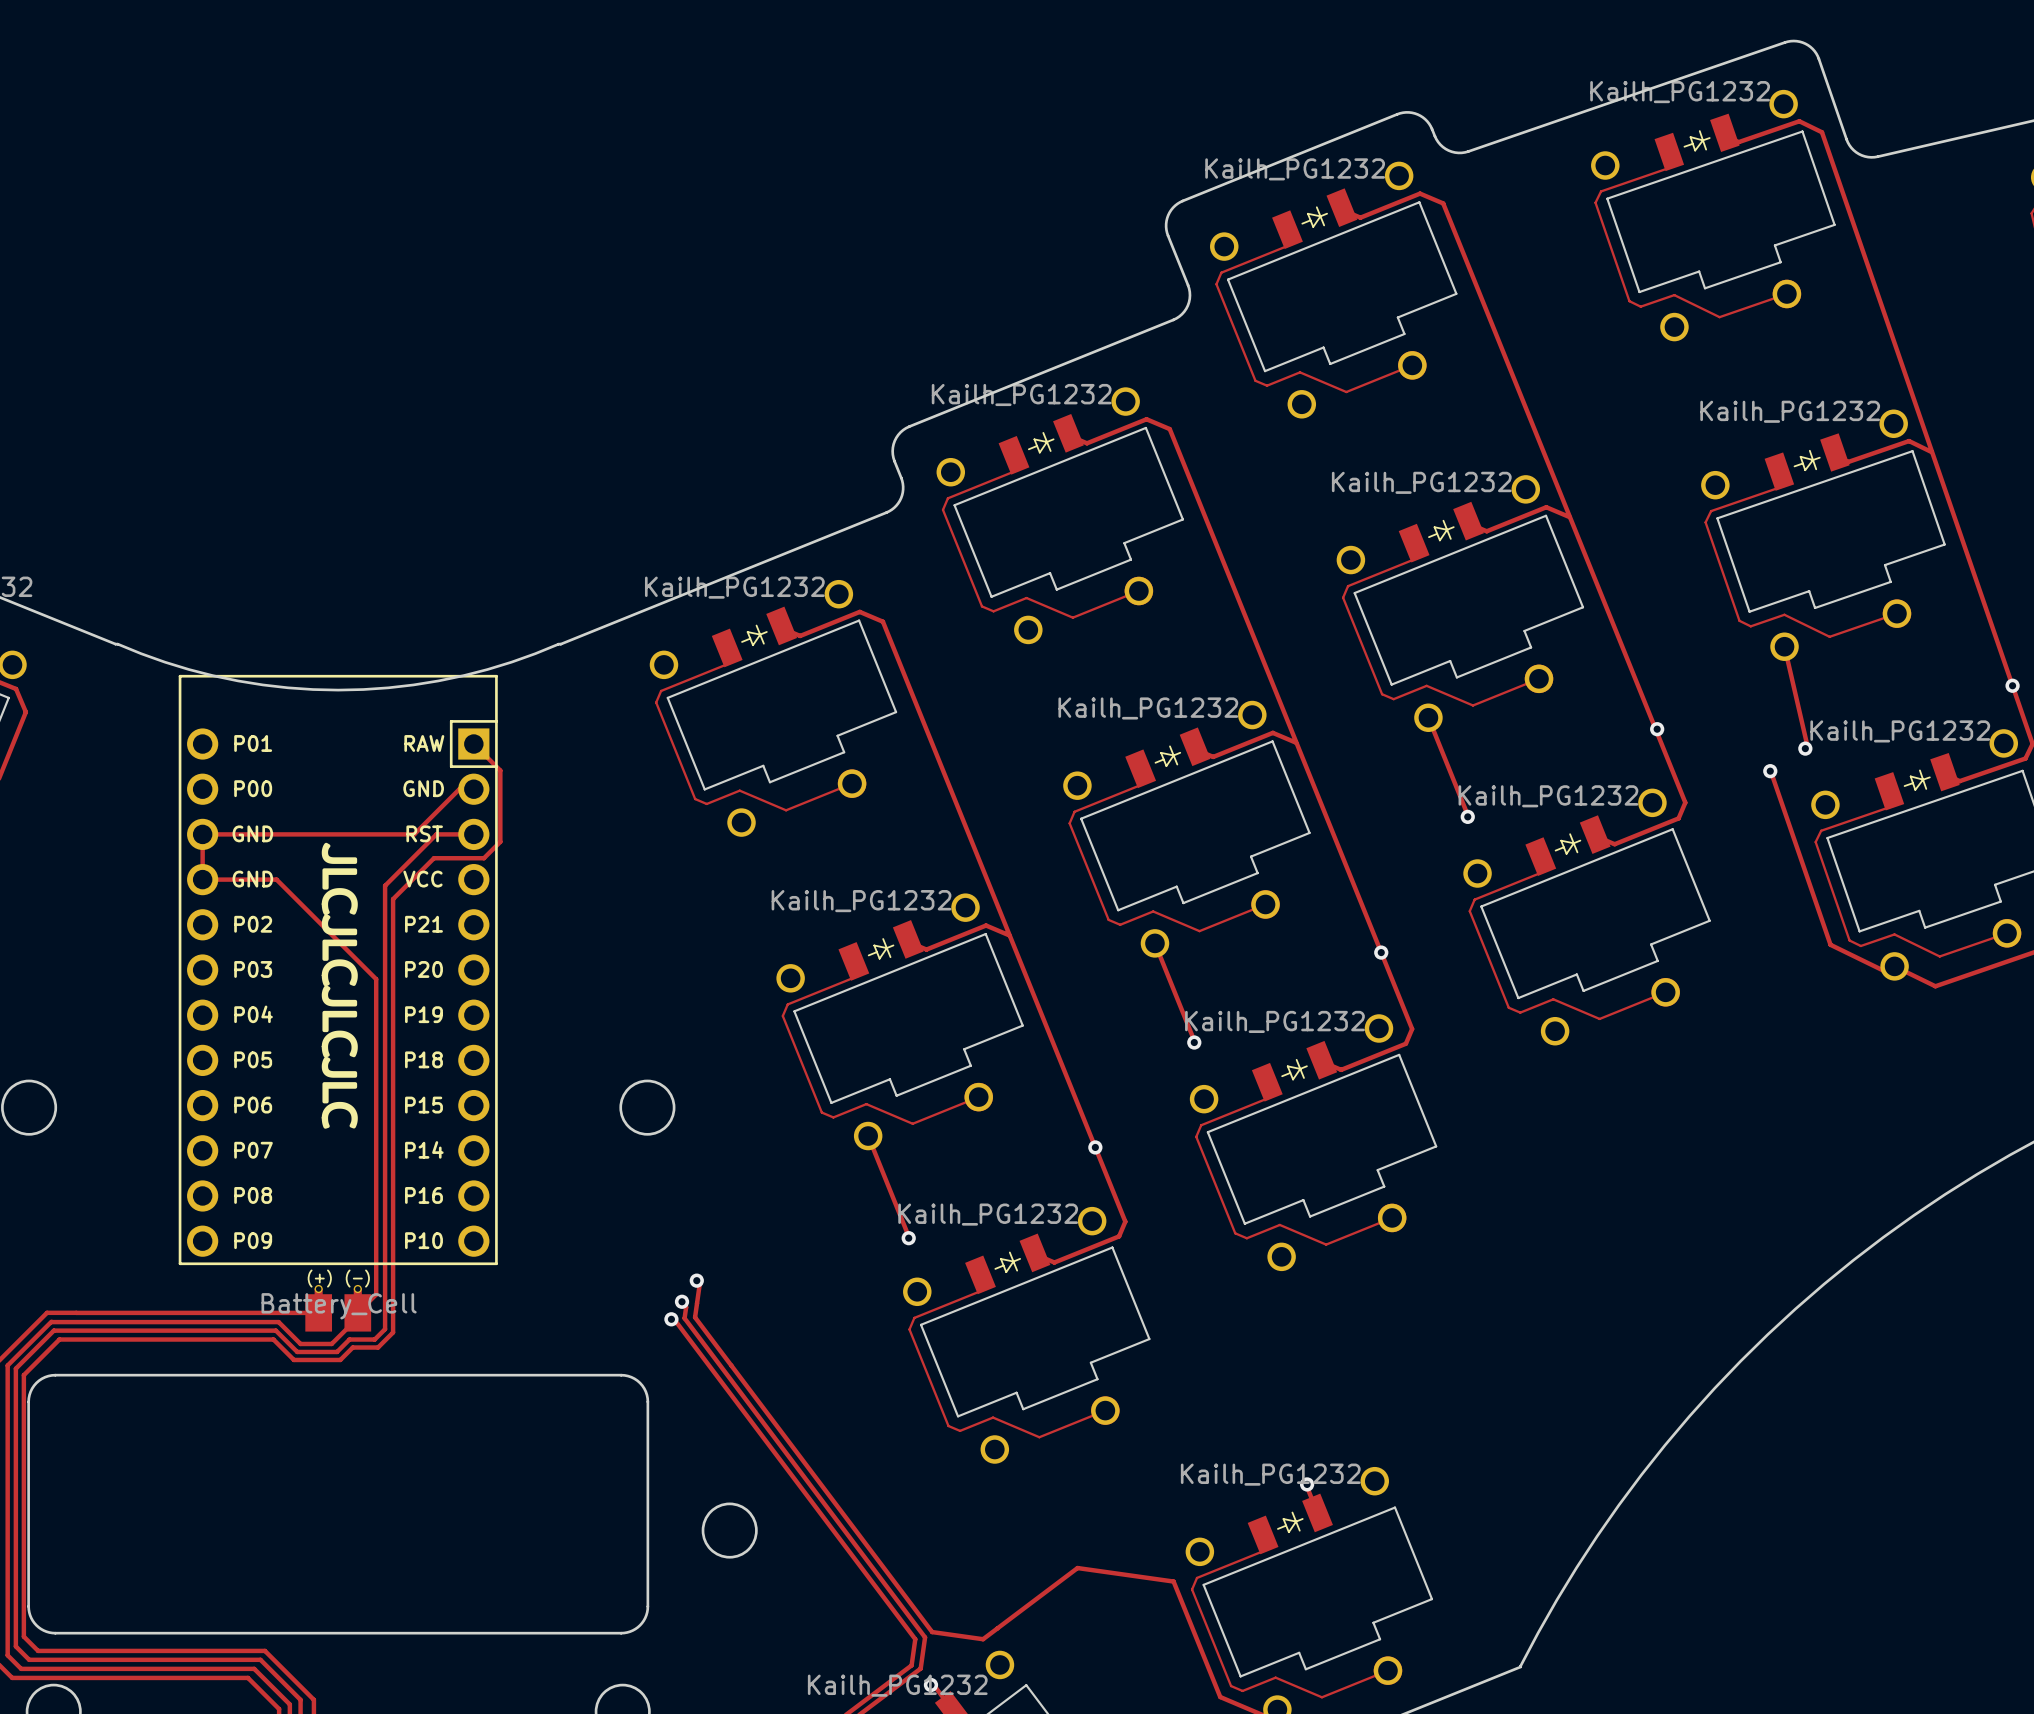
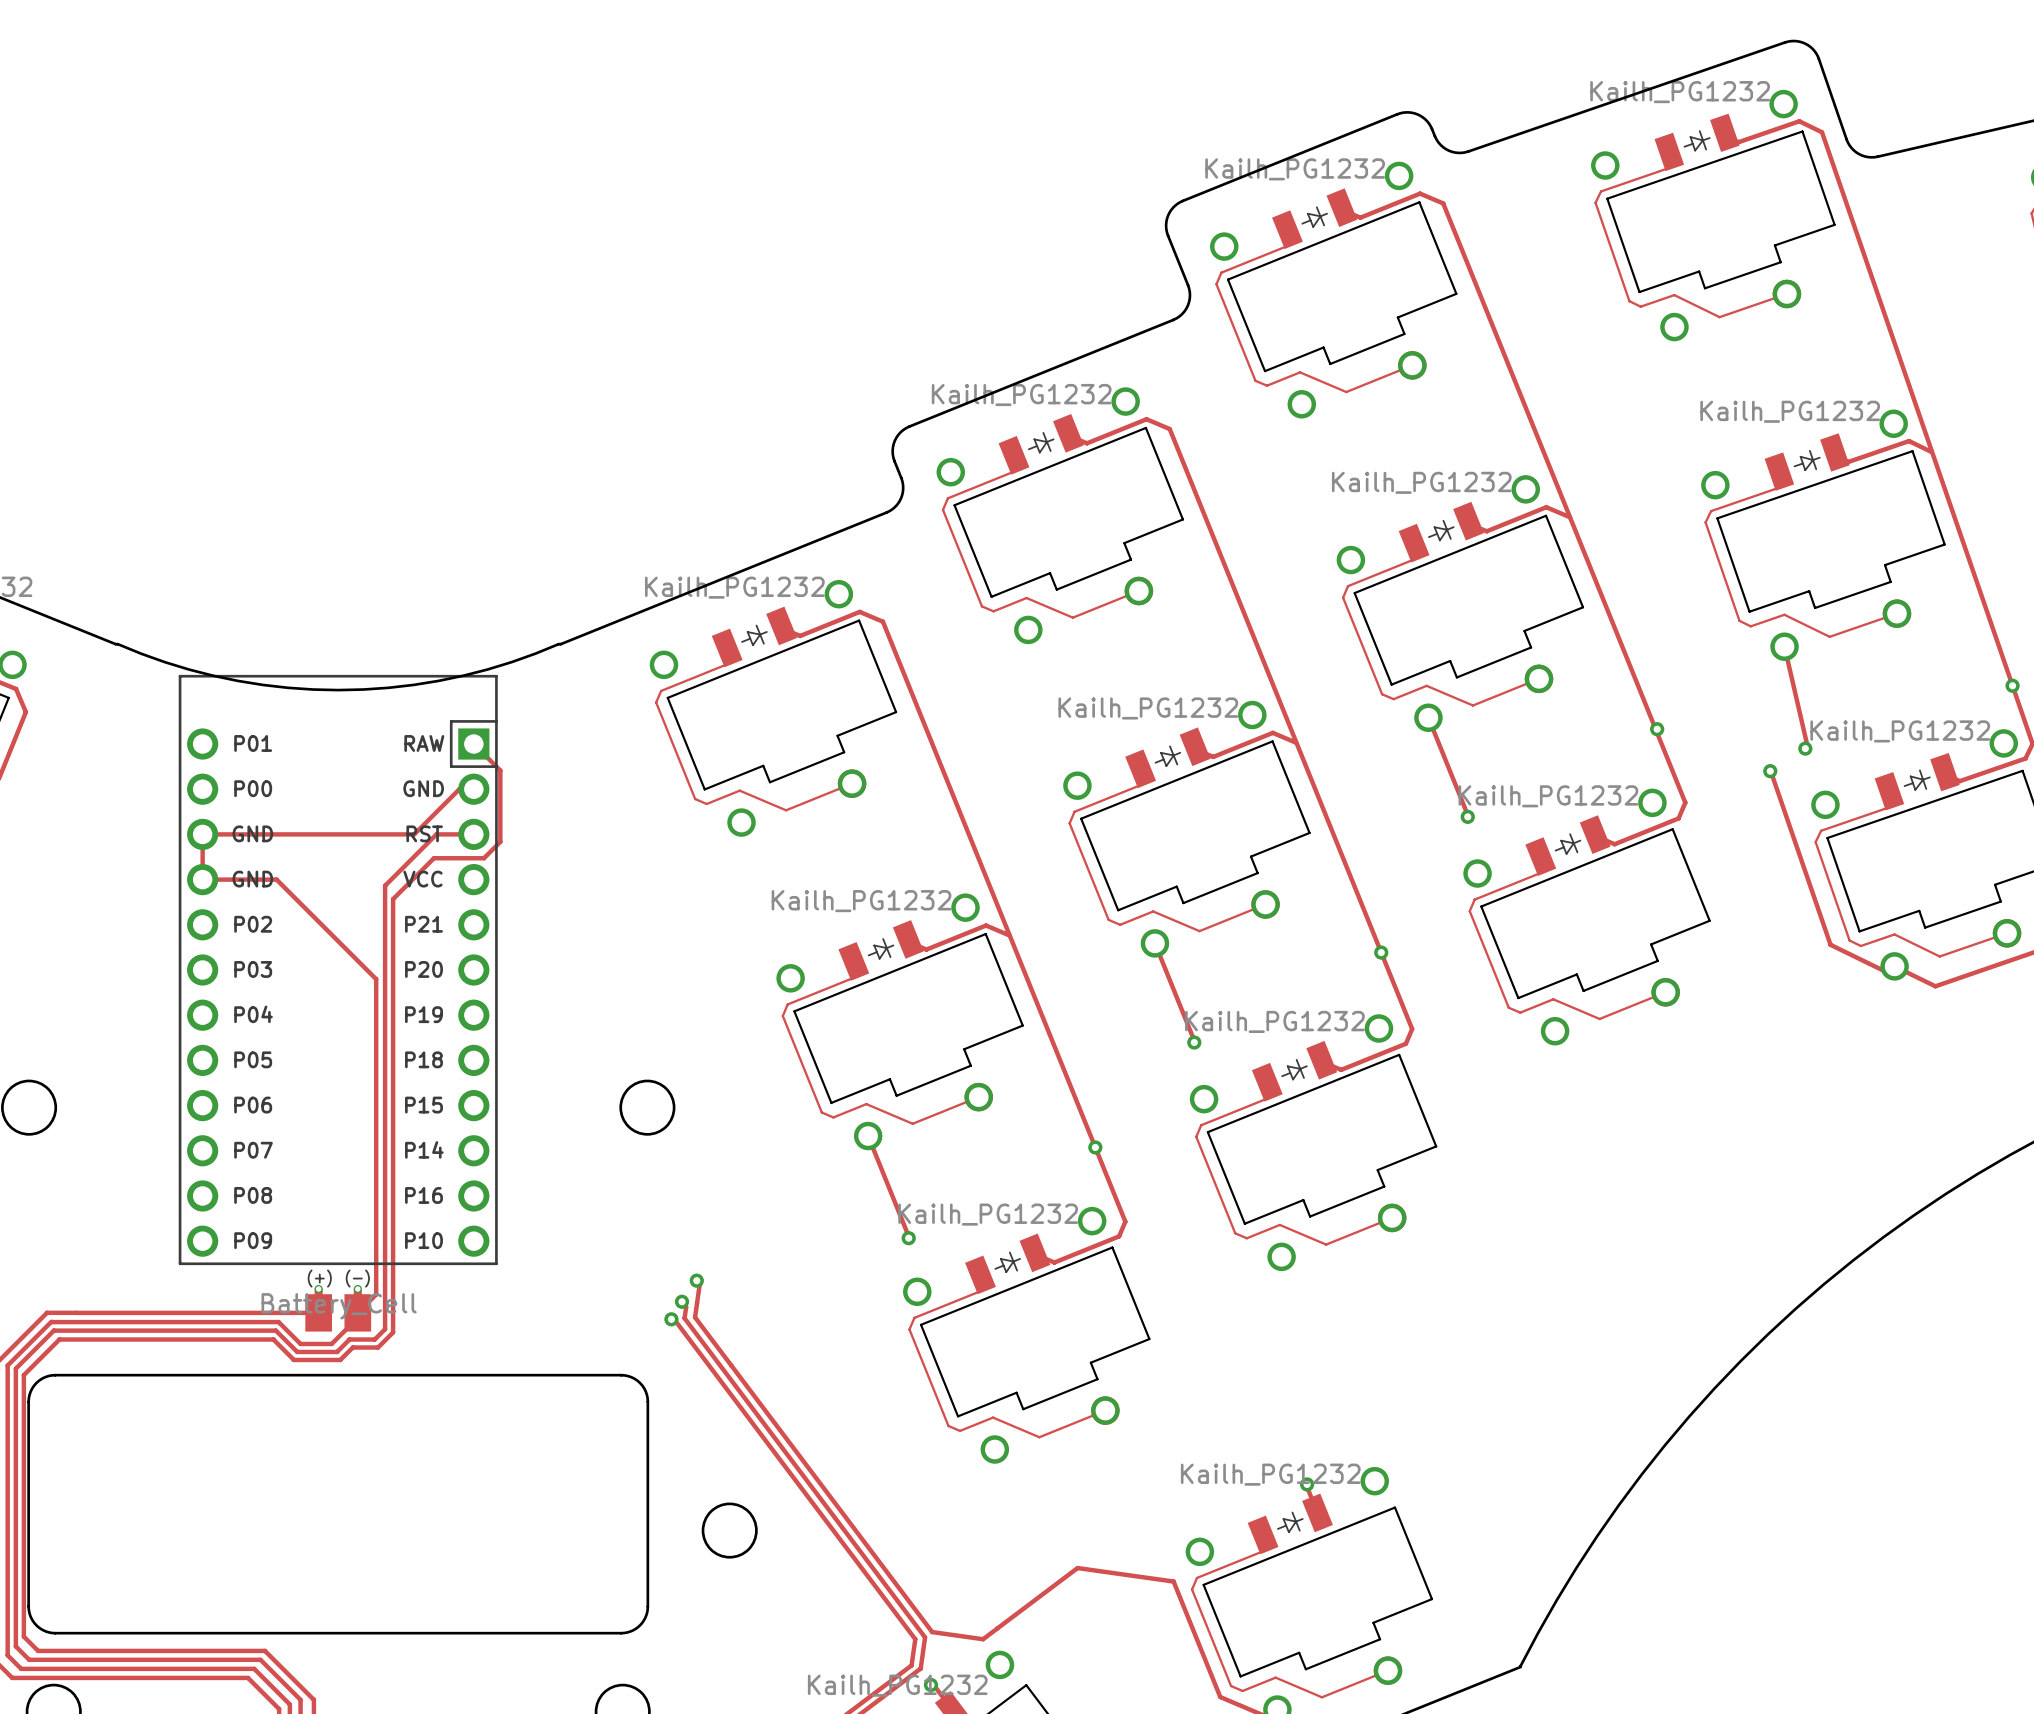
drawing: [321, 842, 358, 1129] -> none

